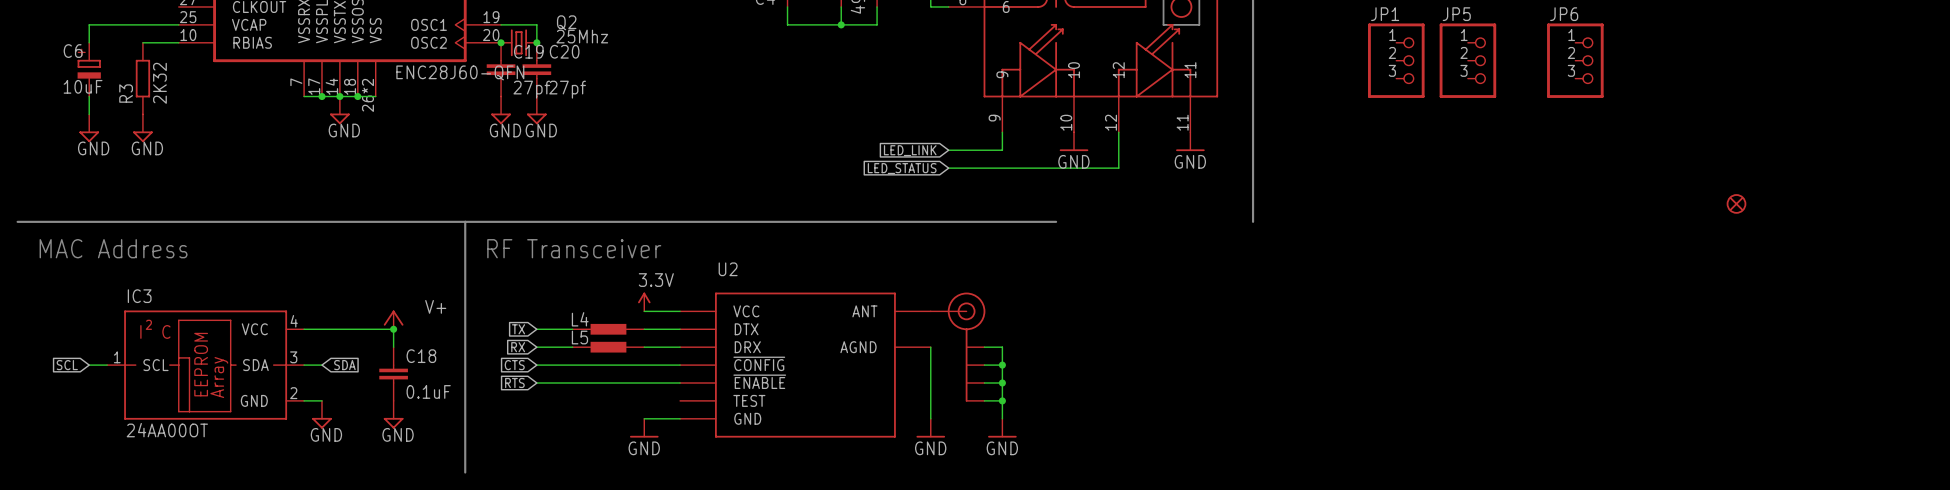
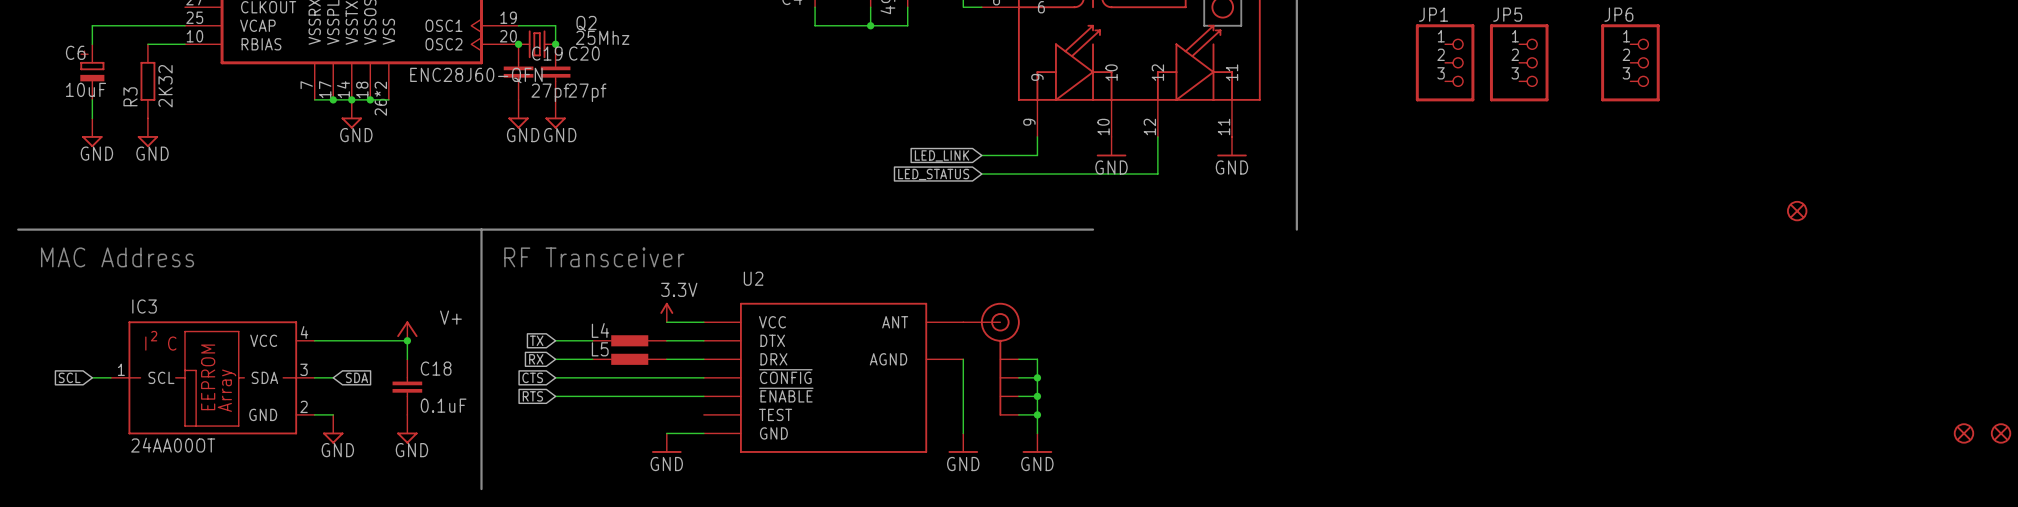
part: none -> (1963, 433)
part: none -> (2001, 433)

